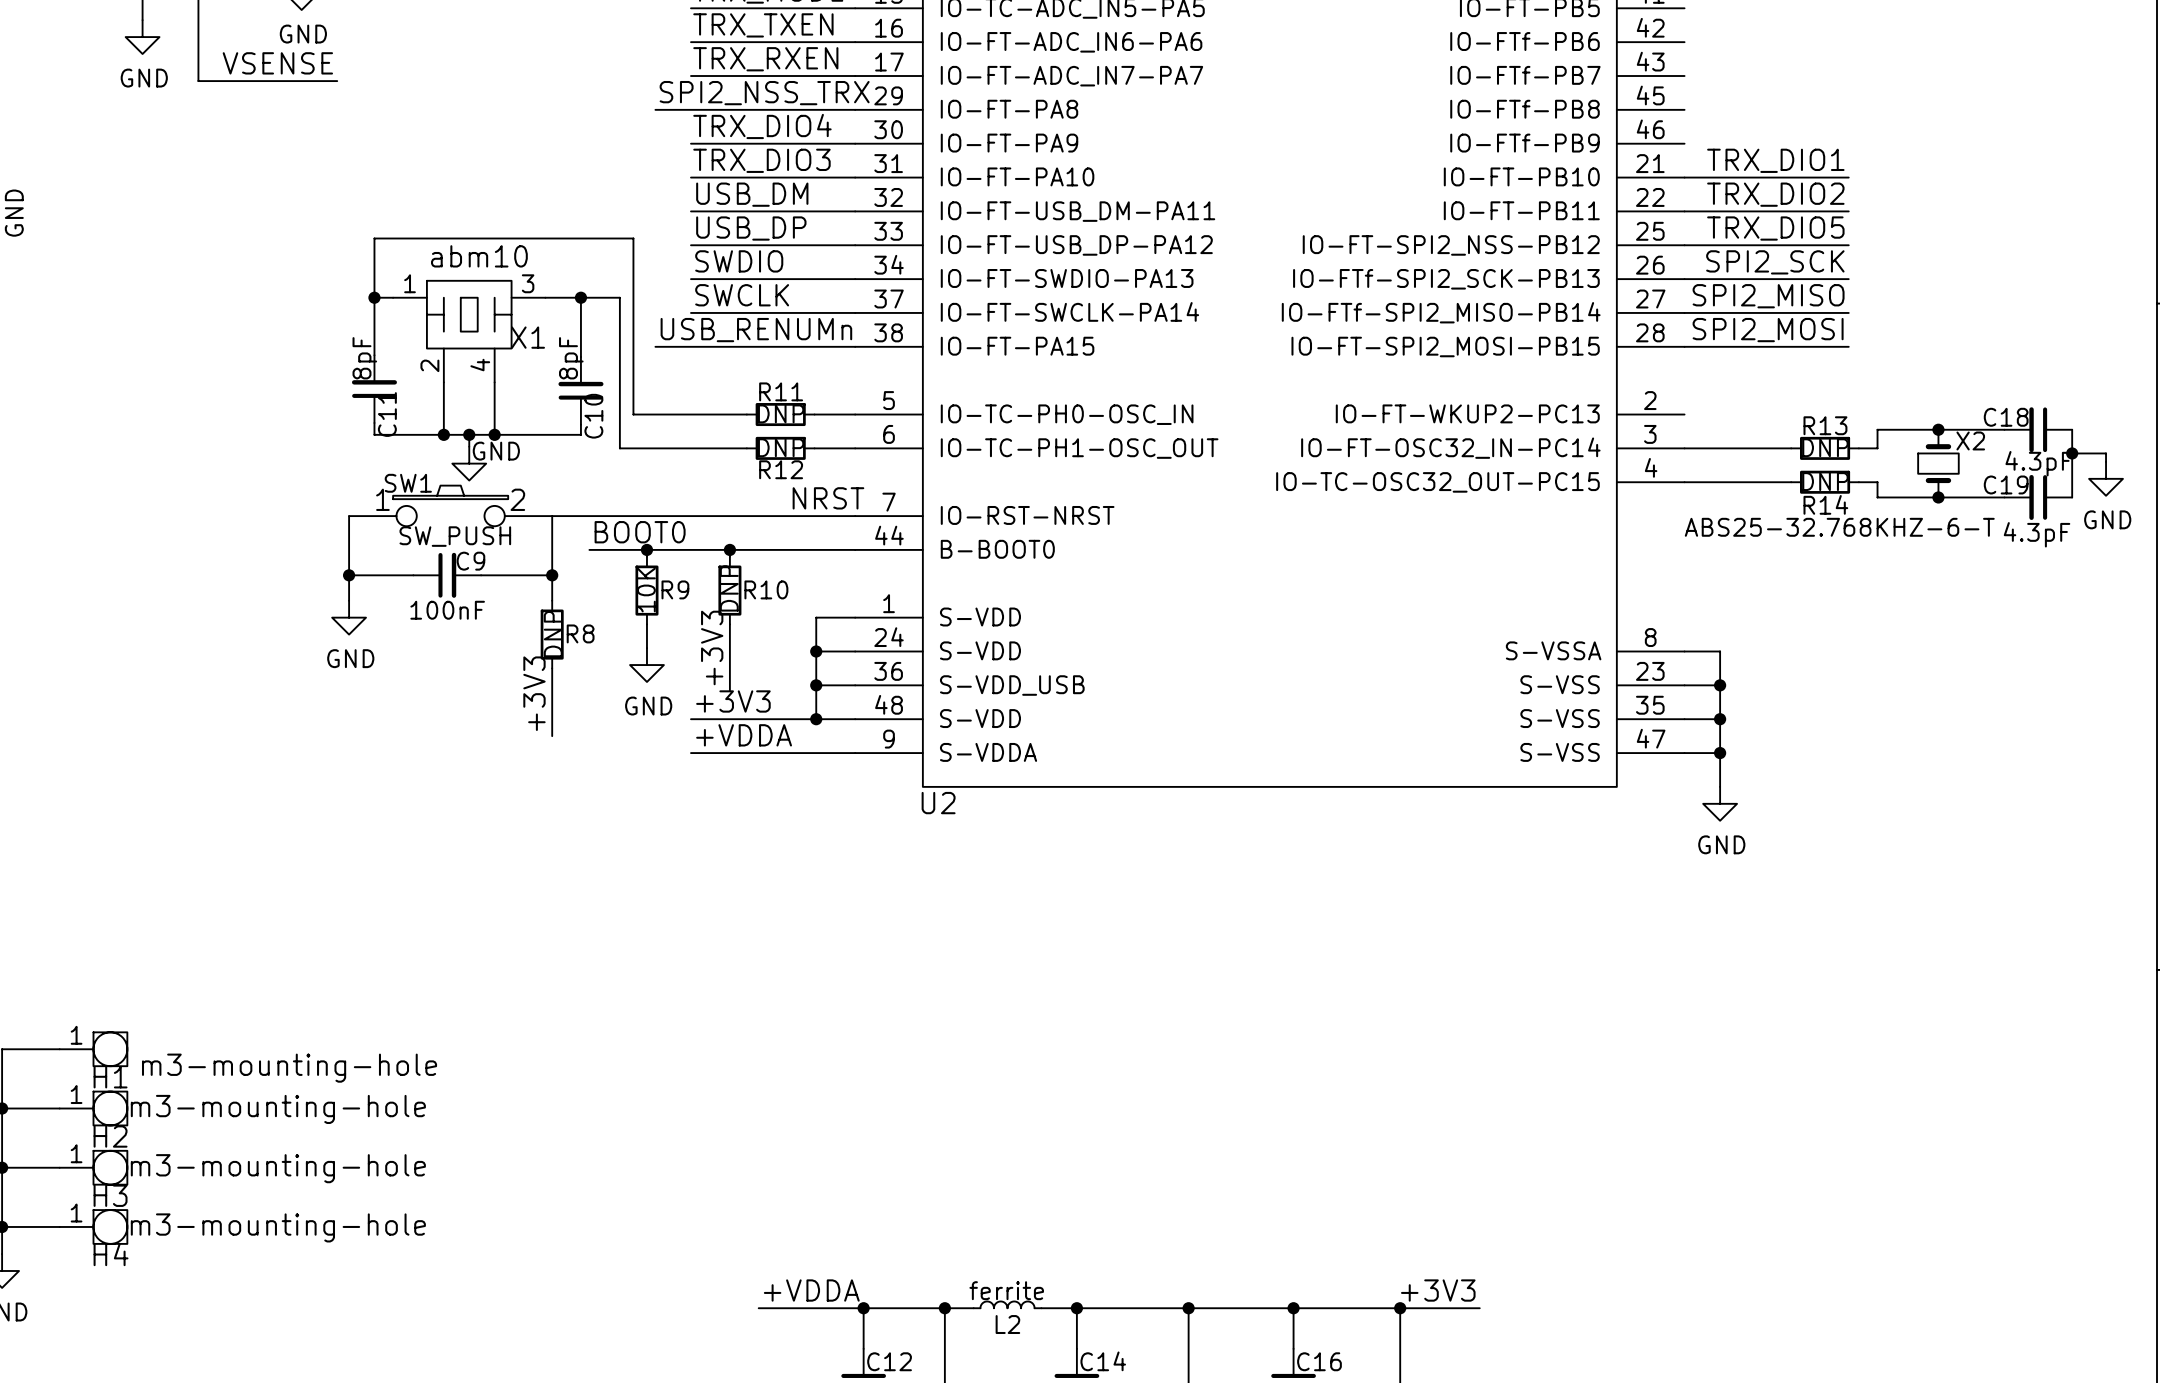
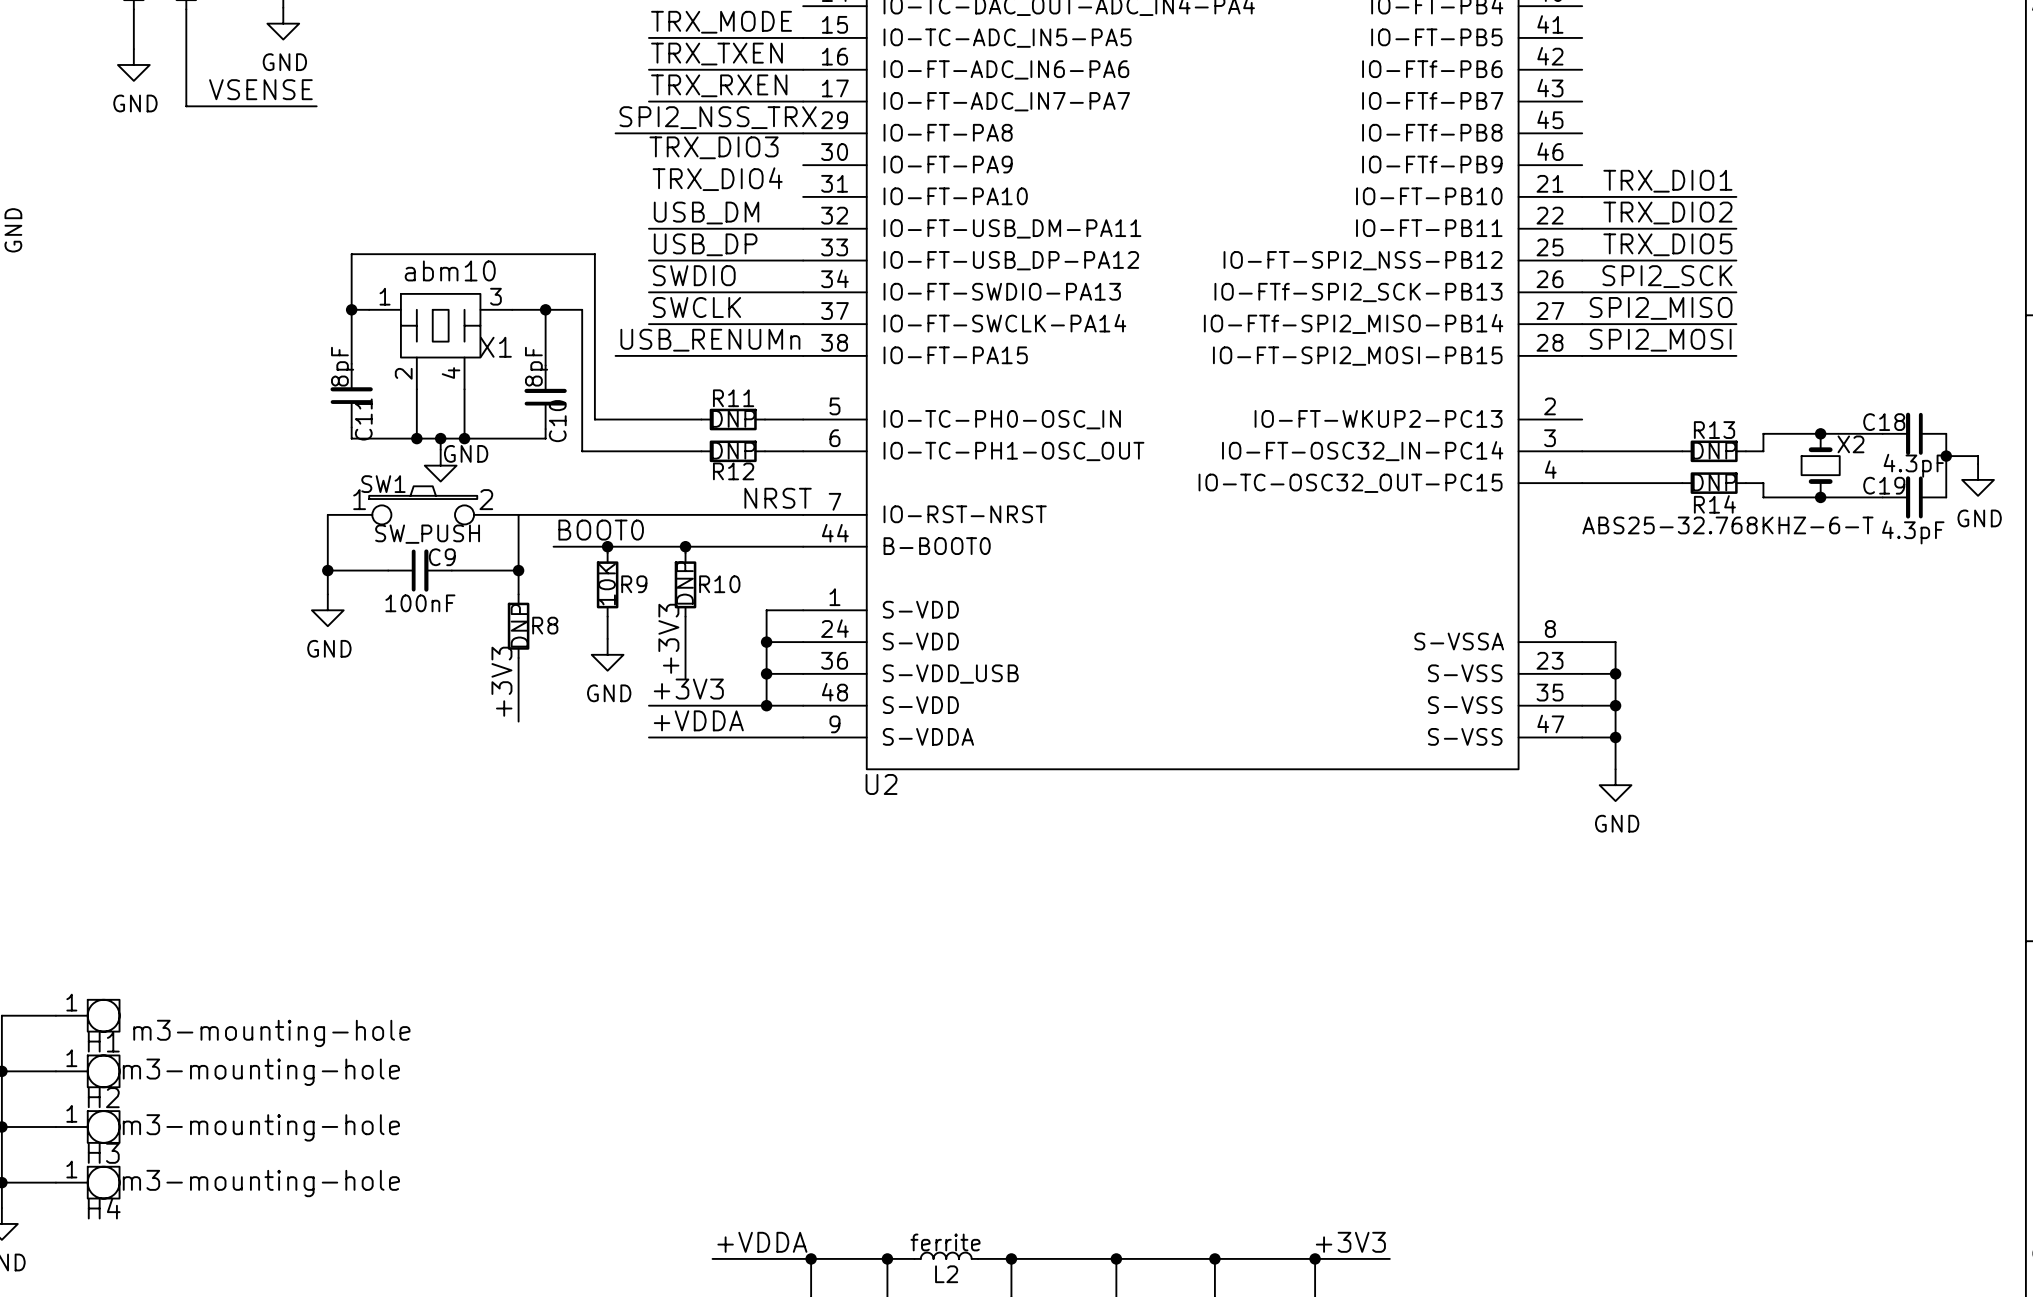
label position: TRX_DIO4 (762, 126) -> TRX_DIO4 (717, 179)
wire: (690, 143) (855, 143) -> none
label position: TRX_DIO3 (761, 160) -> TRX_DIO3 (714, 147)
wire: (690, 177) (855, 177) -> none

